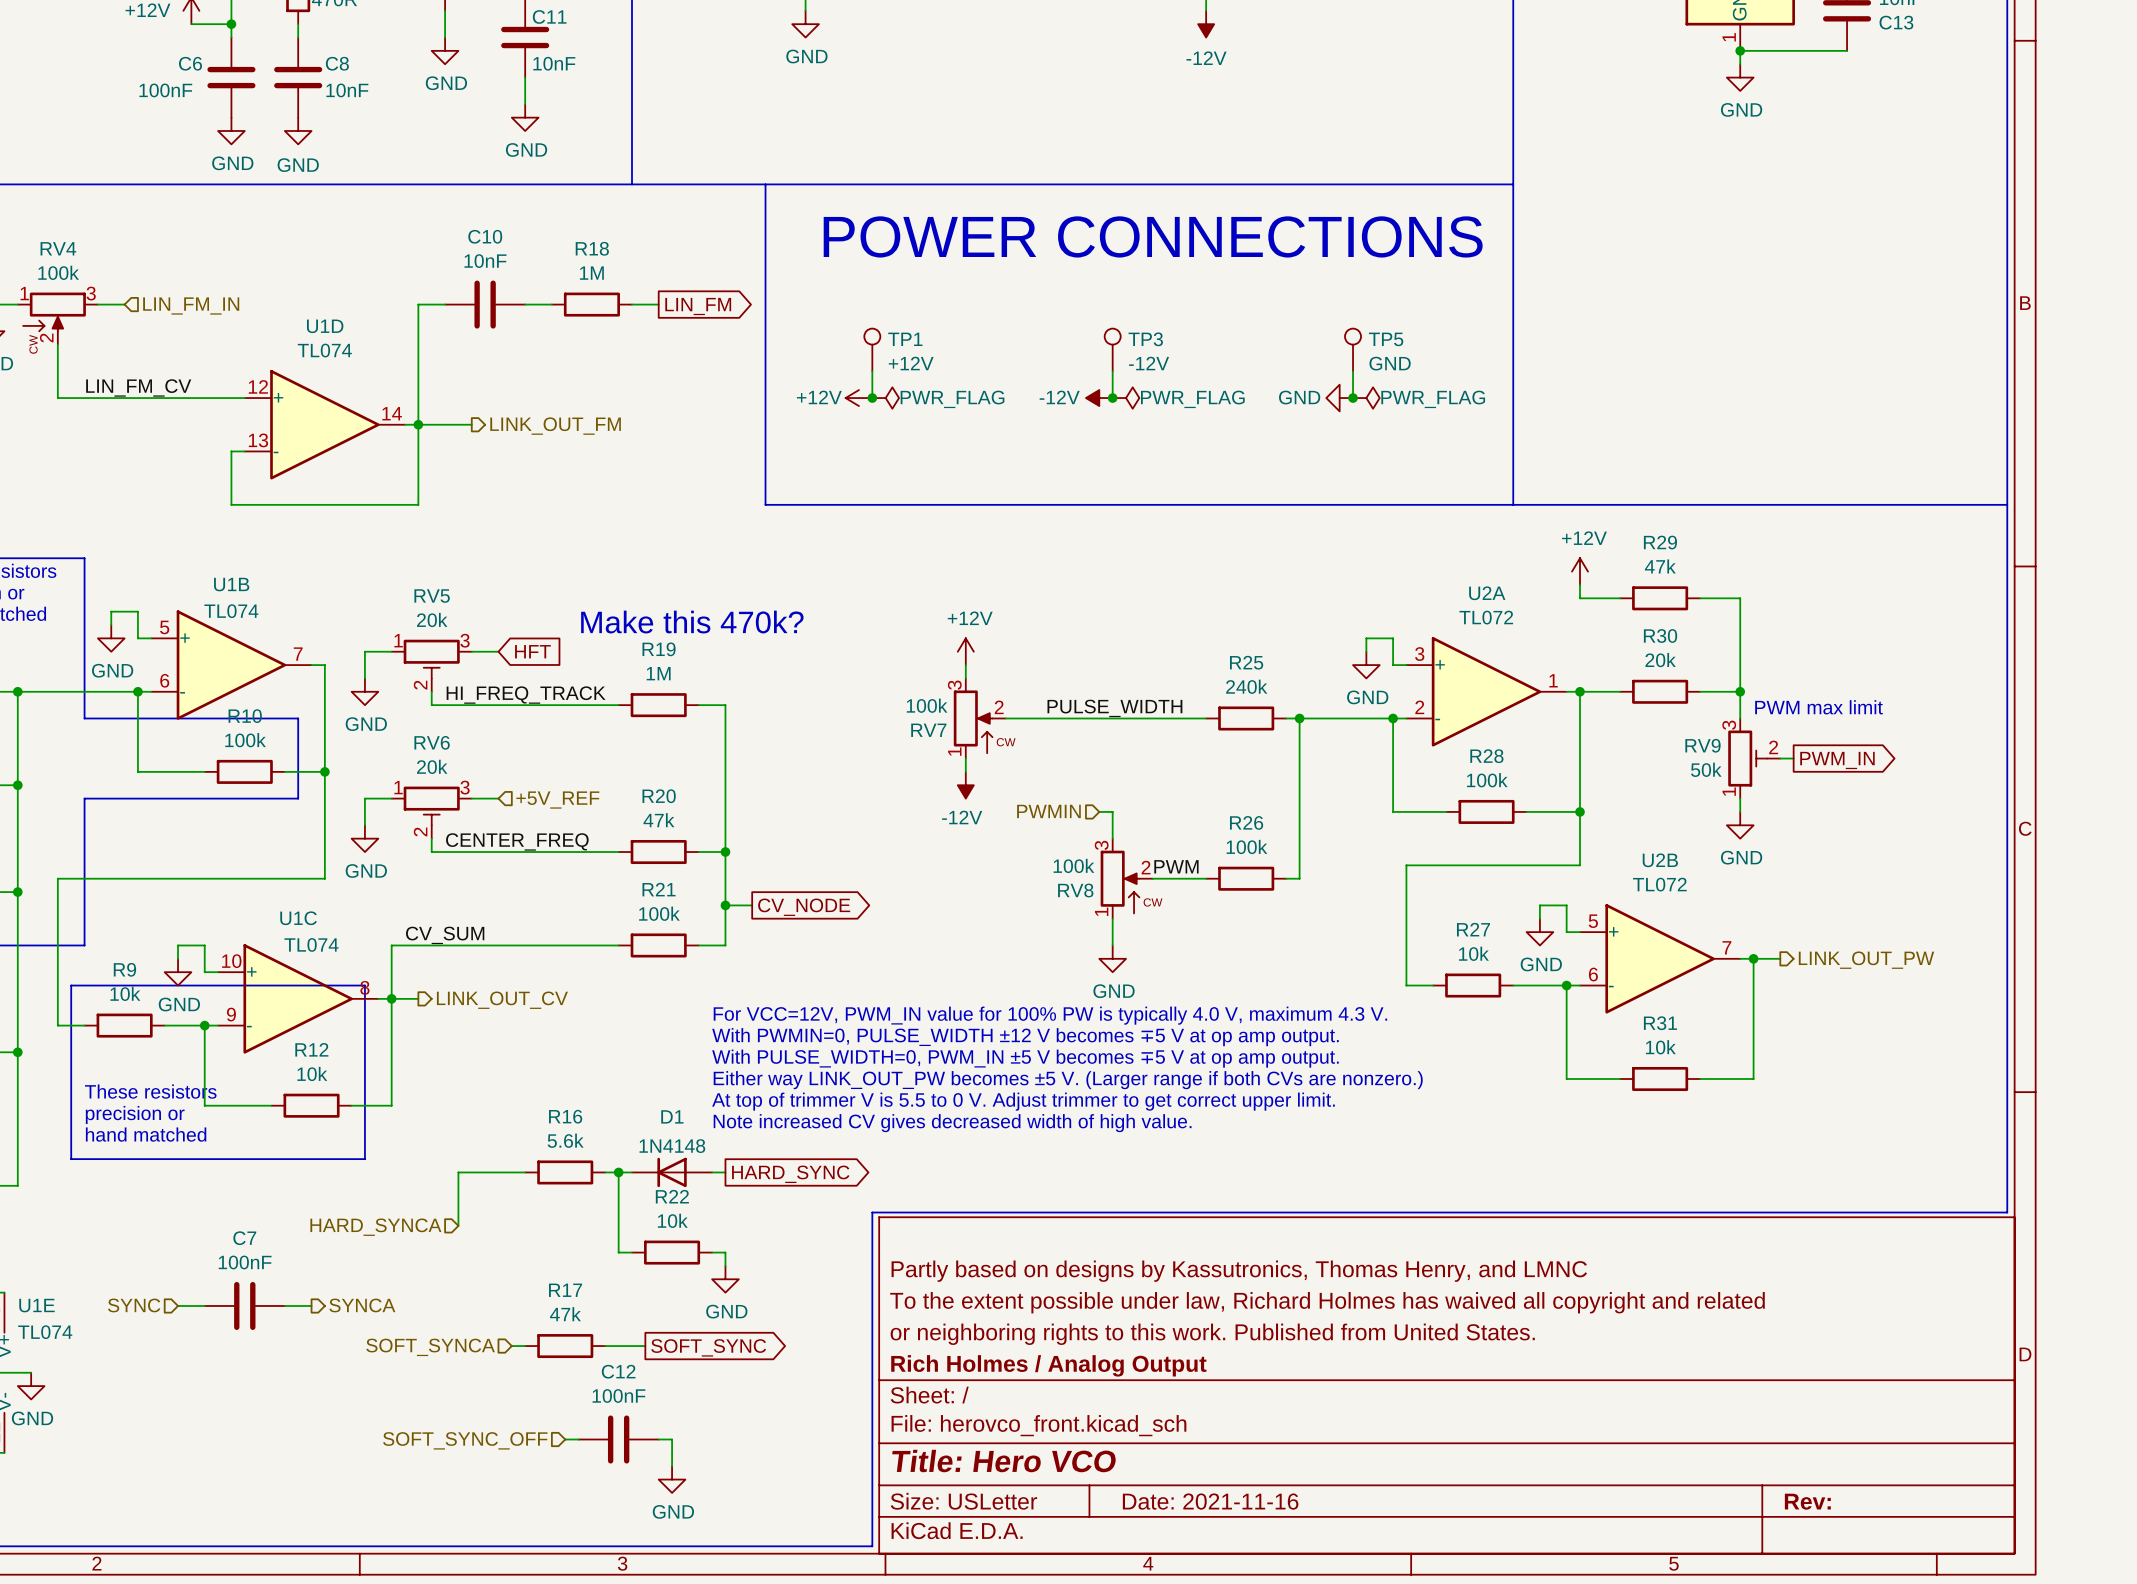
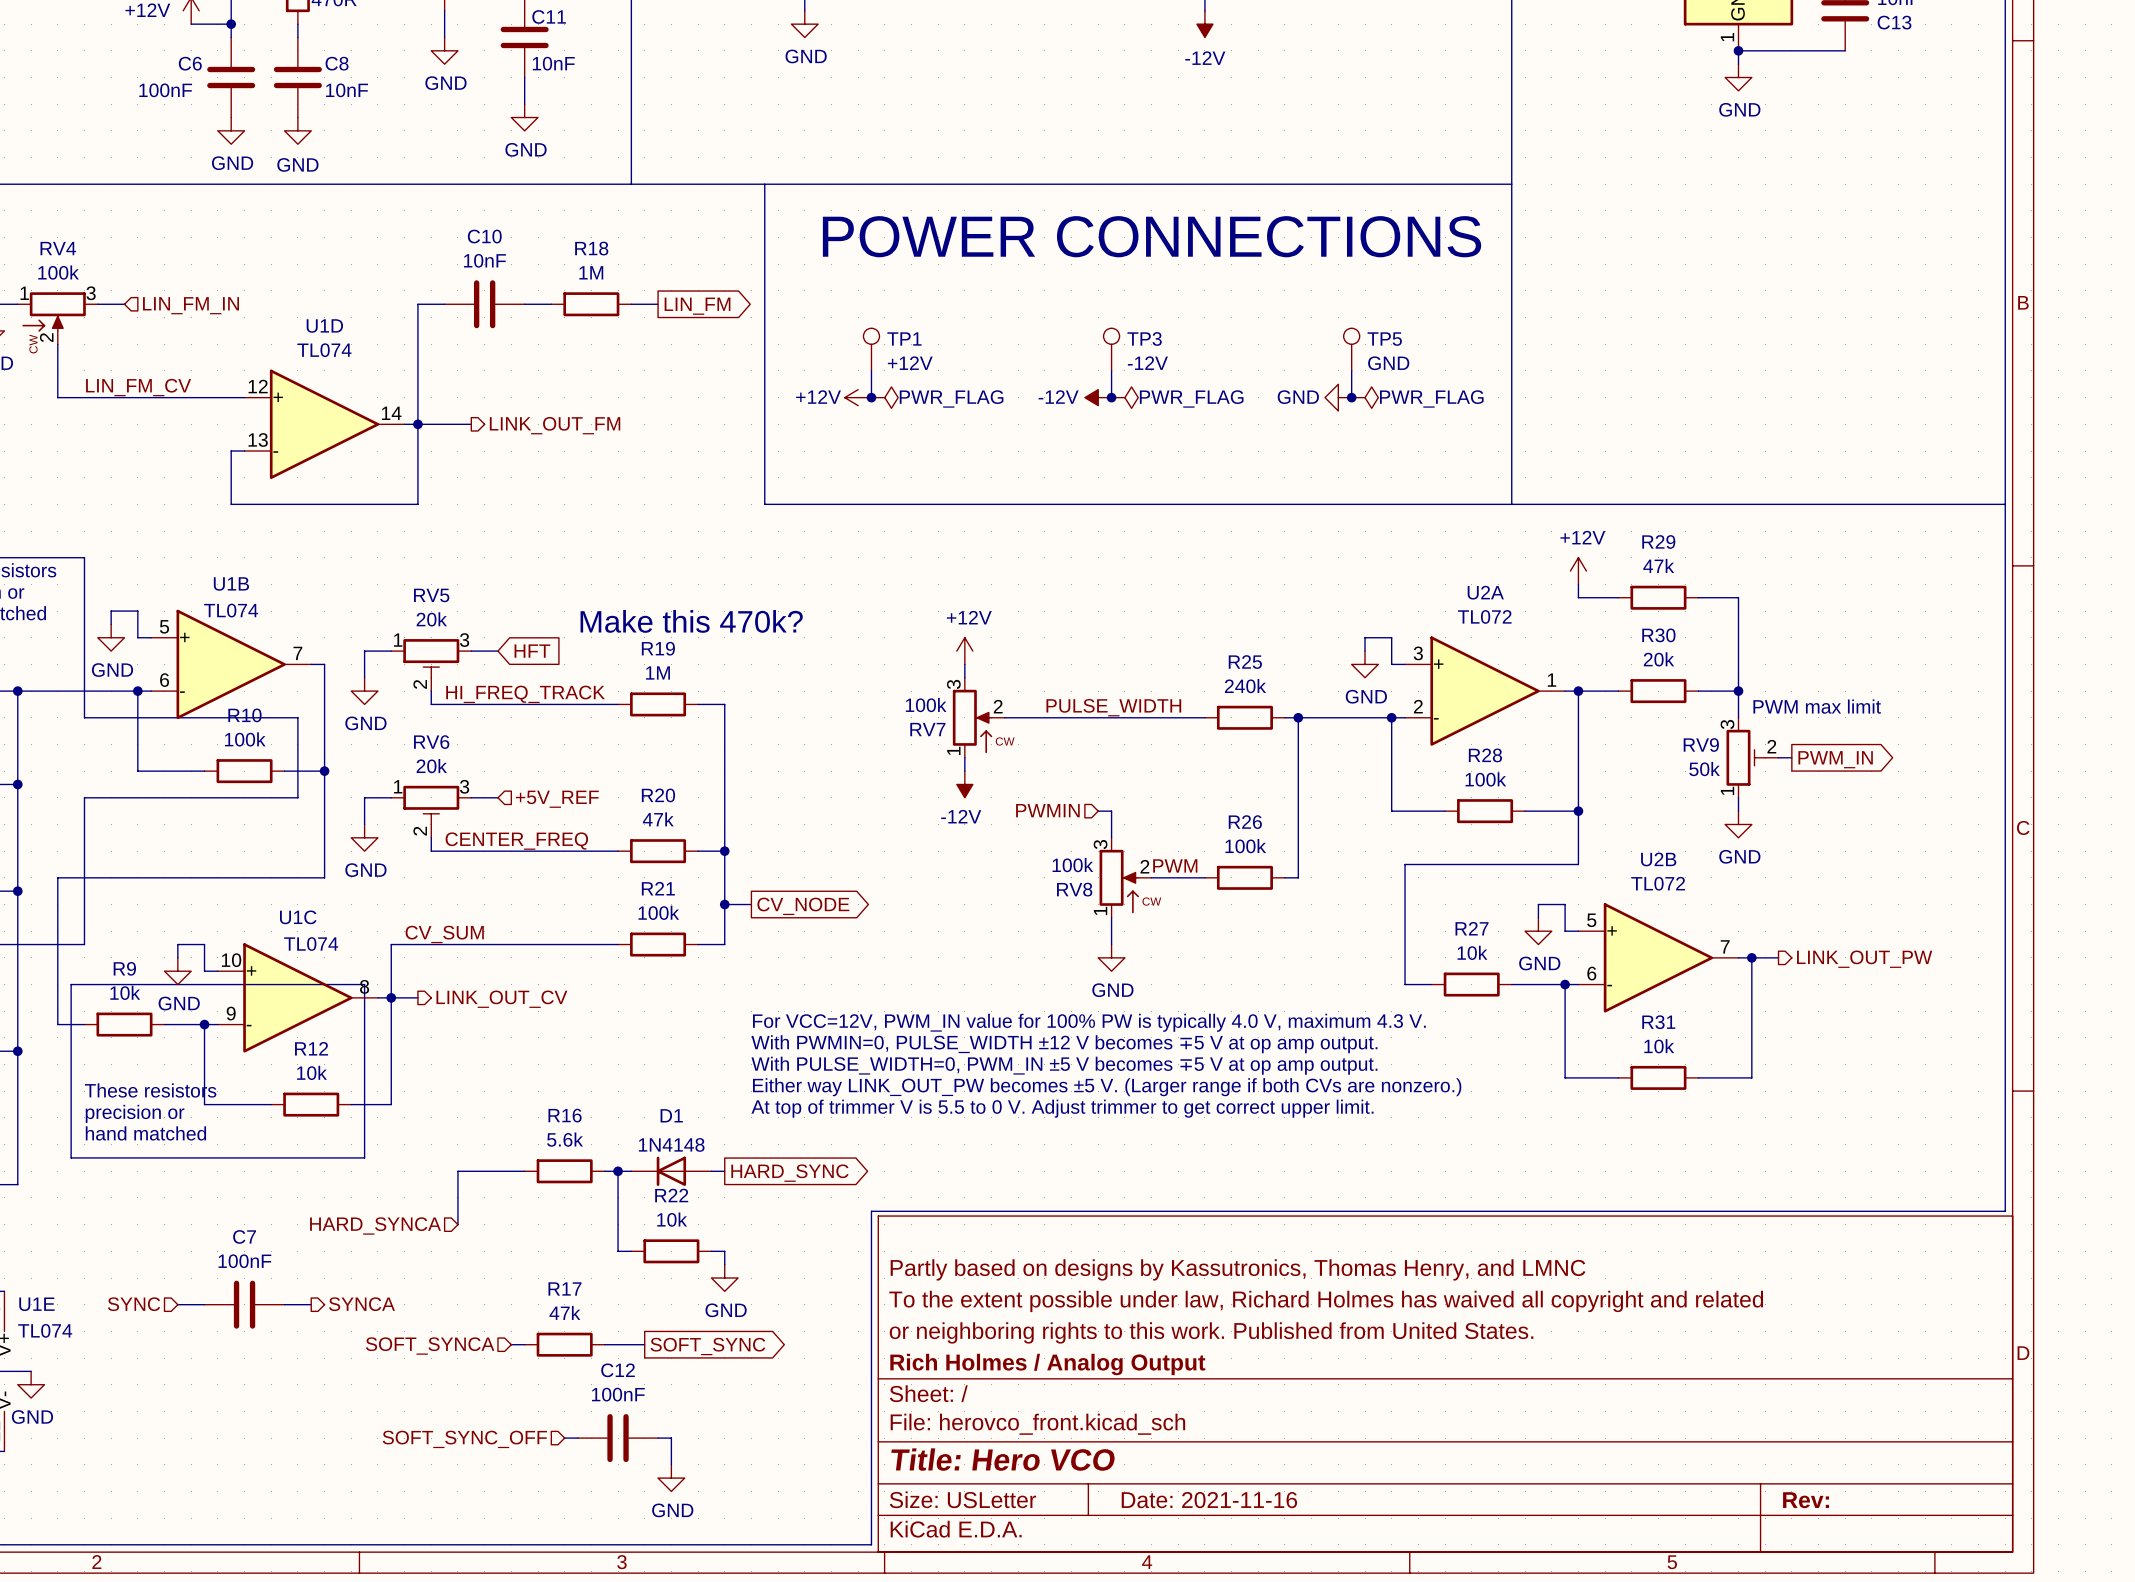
text position: For VCC=12V, PWM_IN value for 100% PW is typically 4.0 V, maximum 4.3 V. (1050, 1015) -> For VCC=12V, PWM_IN value for 100% PW is typically 4.0 V, maximum 4.3 V. (1089, 1022)
text position: With PWMIN=0, PULSE_WIDTH ±12 V becomes ∓5 V at op amp output. (1025, 1037) -> With PWMIN=0, PULSE_WIDTH ±12 V becomes ∓5 V at op amp output. (1064, 1044)
text position: With PULSE_WIDTH=0, PWM_IN ±5 V becomes ∓5 V at op amp output. (1025, 1058) -> With PULSE_WIDTH=0, PWM_IN ±5 V becomes ∓5 V at op amp output. (1064, 1065)
text position: Either way LINK_OUT_PW becomes ±5 V. (Larger range if both CVs are nonzero.) (1068, 1080) -> Either way LINK_OUT_PW becomes ±5 V. (Larger range if both CVs are nonzero.) (1107, 1087)
text position: At top of trimmer V is 5.5 to 0 V. Adjust trimmer to get correct upper limit. (1023, 1101) -> At top of trimmer V is 5.5 to 0 V. Adjust trimmer to get correct upper limit. (1062, 1108)
text: Note increased CV gives decreased width of high value. (952, 1123) -> none

